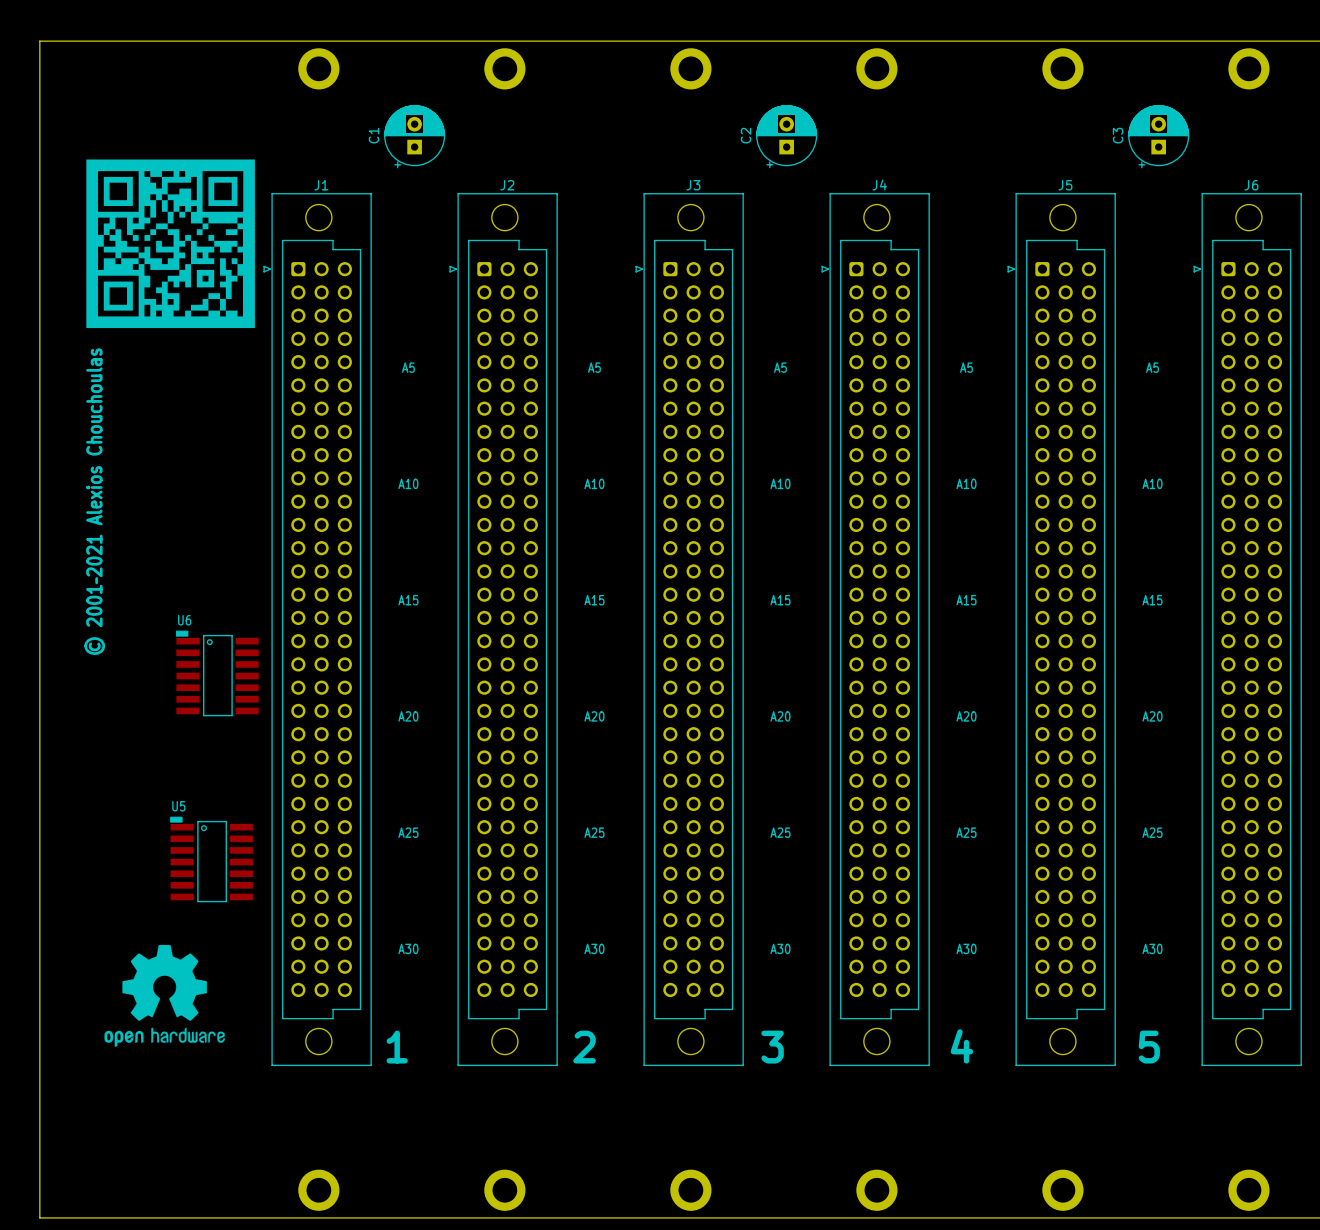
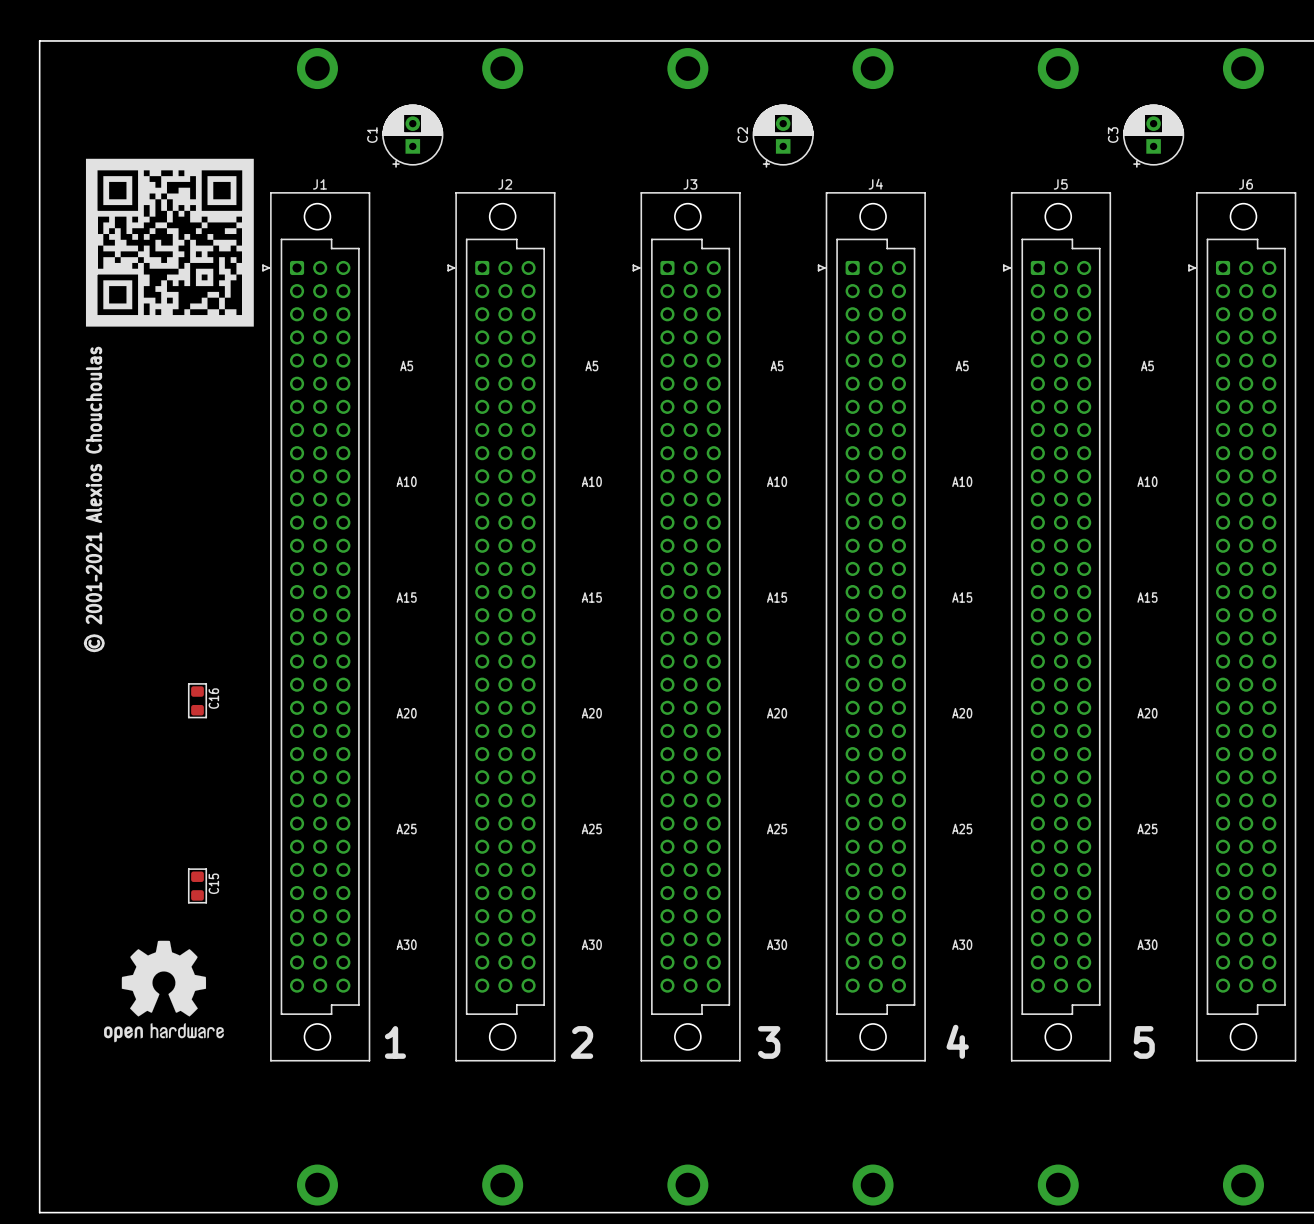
U6: (217, 673) -> none
C16: none -> (197, 700)
U5: (211, 859) -> none
C15: none -> (197, 885)

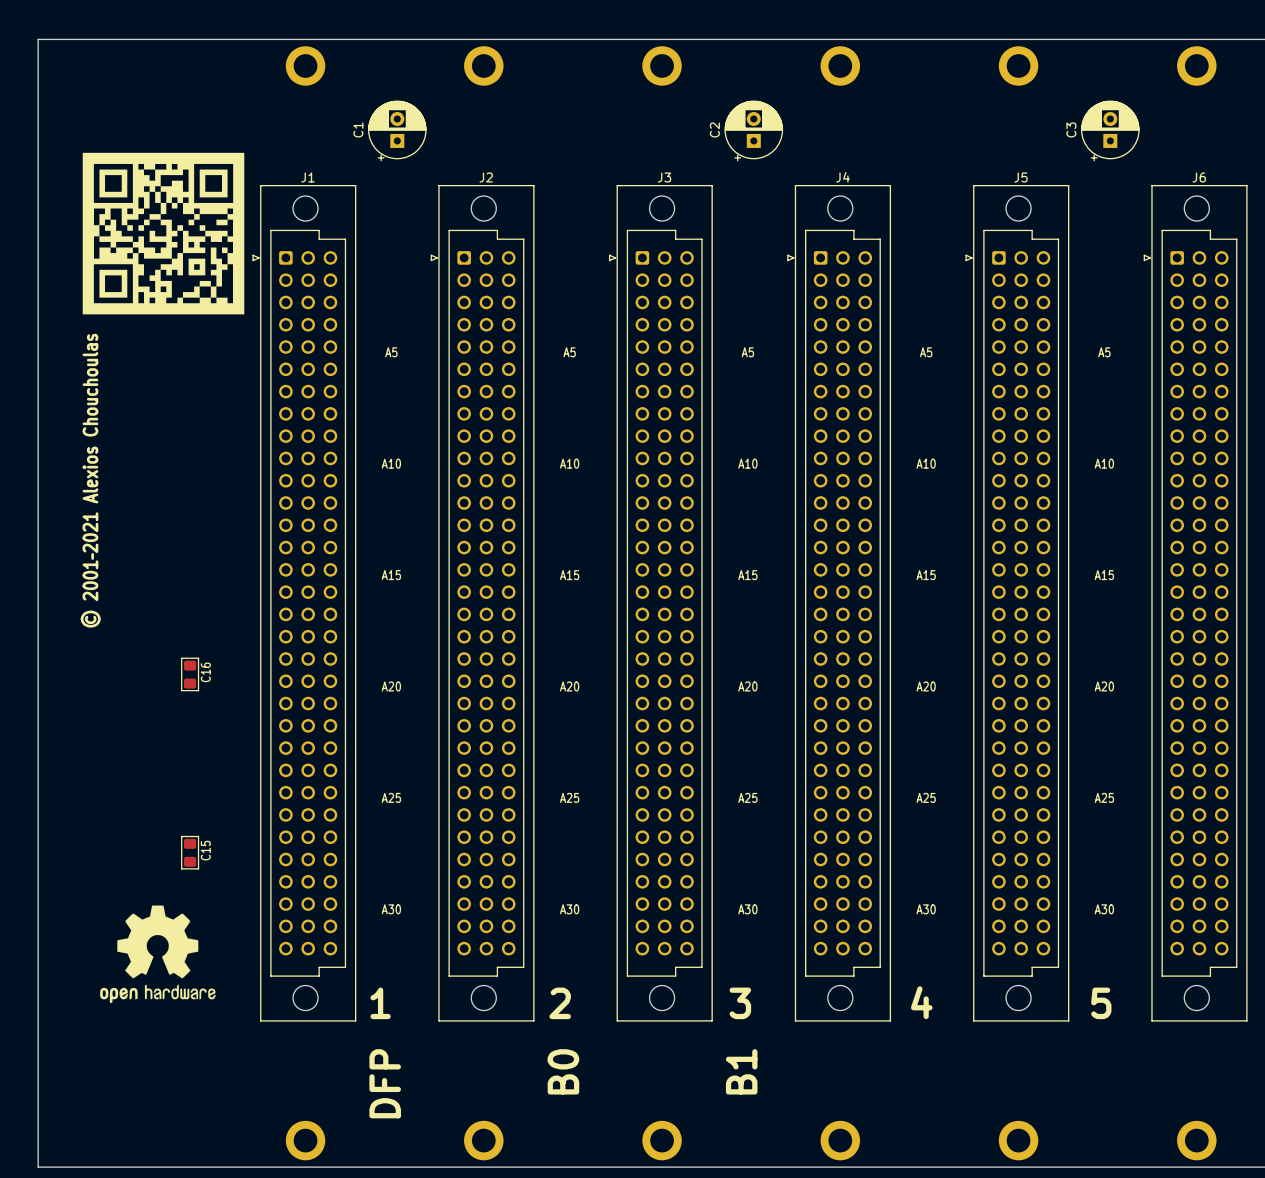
text: none -> B0 (563, 1071)
text: none -> B1 (741, 1071)
text: none -> DFP (385, 1083)

